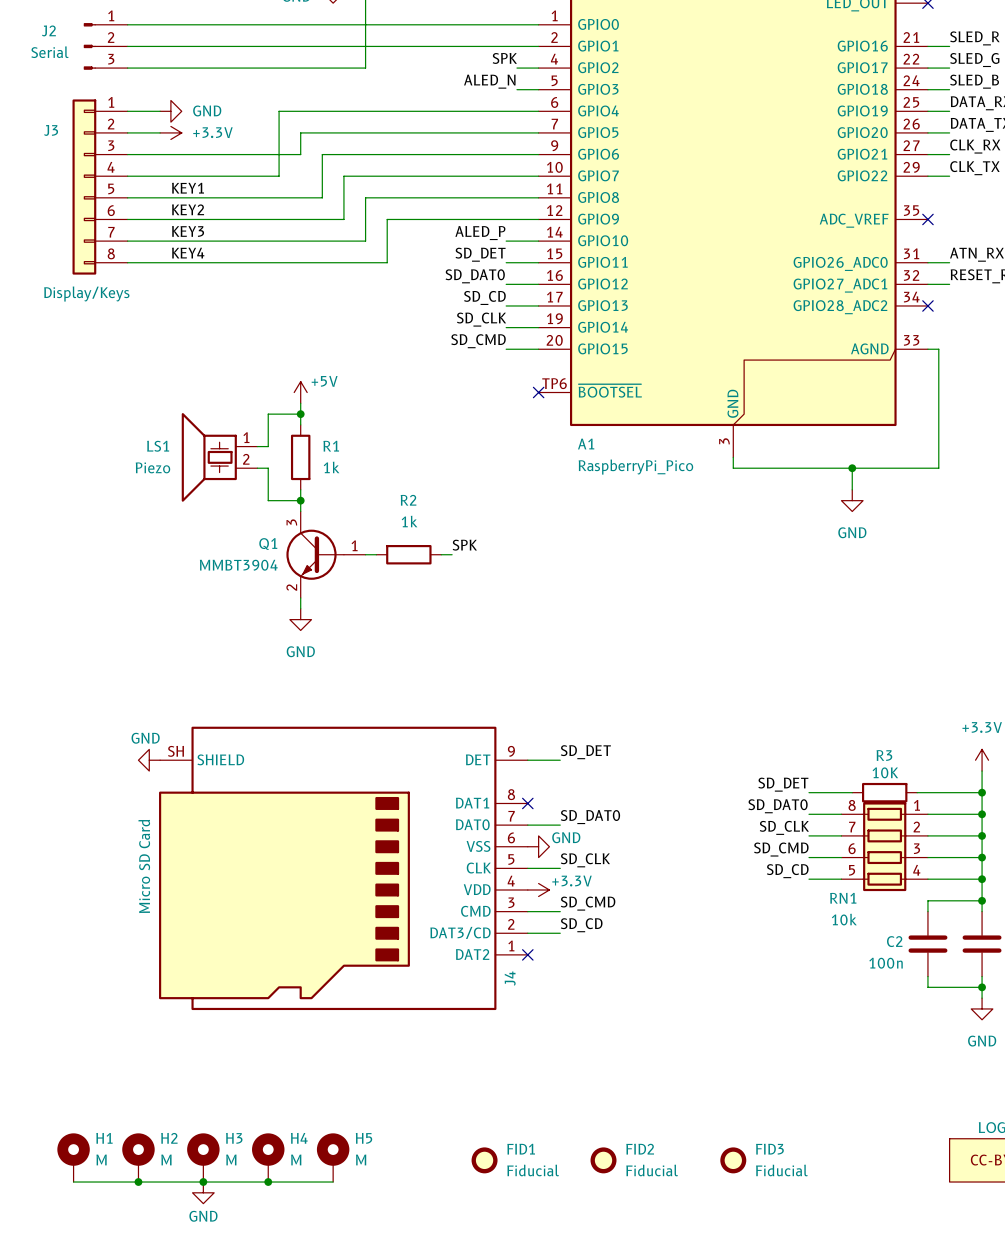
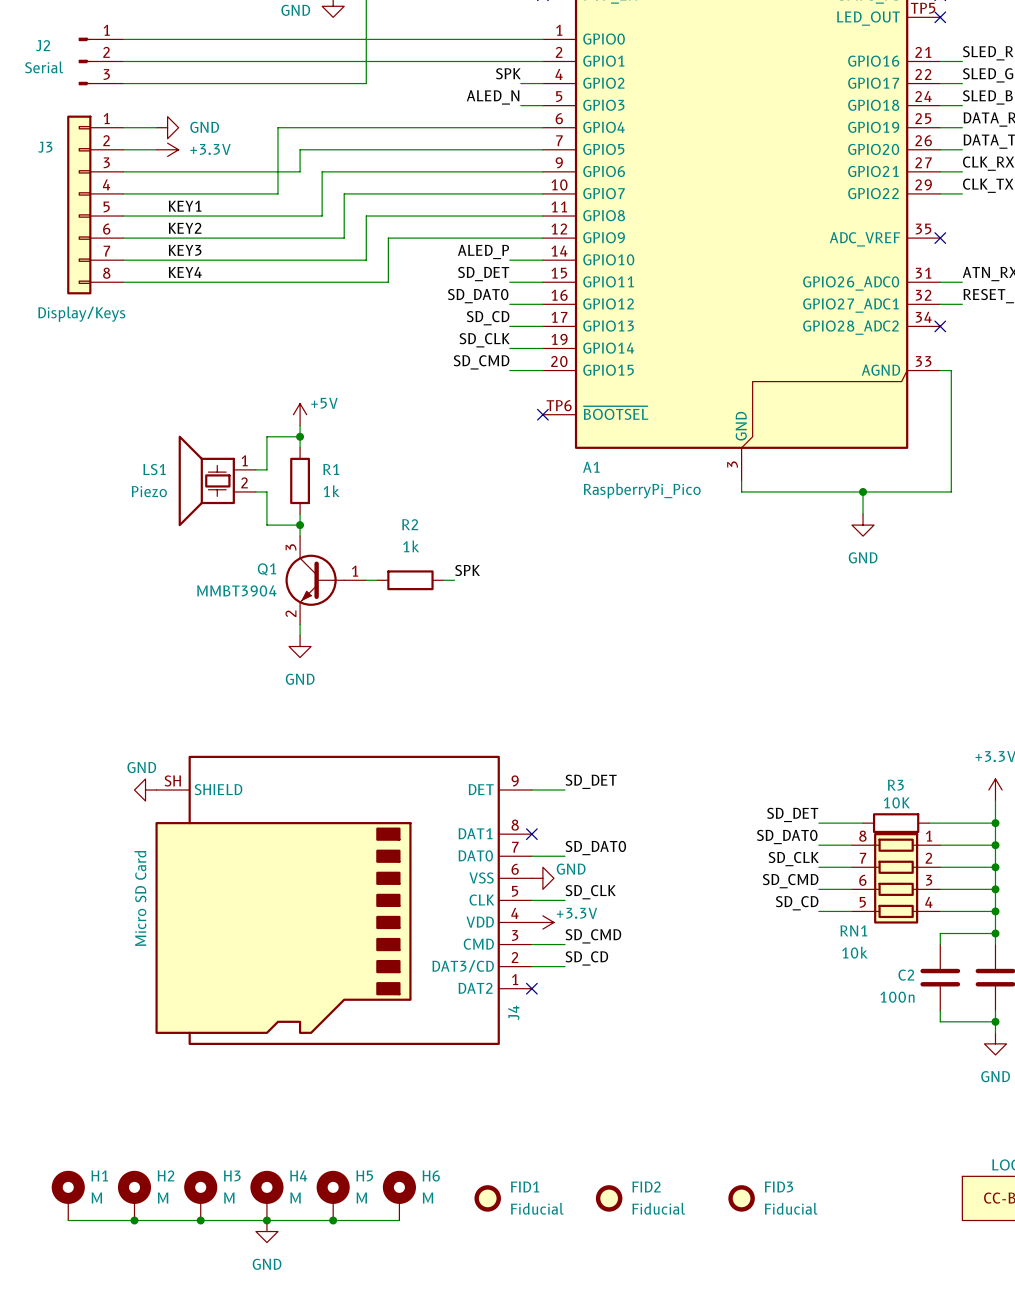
H6: none -> M (399, 1195)
wire: none -> (333, 1220) (399, 1220)
junction: none -> (333, 1220)
power symbol position: GND (203, 1192) -> GND (266, 1231)
power symbol text position: GND (203, 1216) -> GND (267, 1264)

